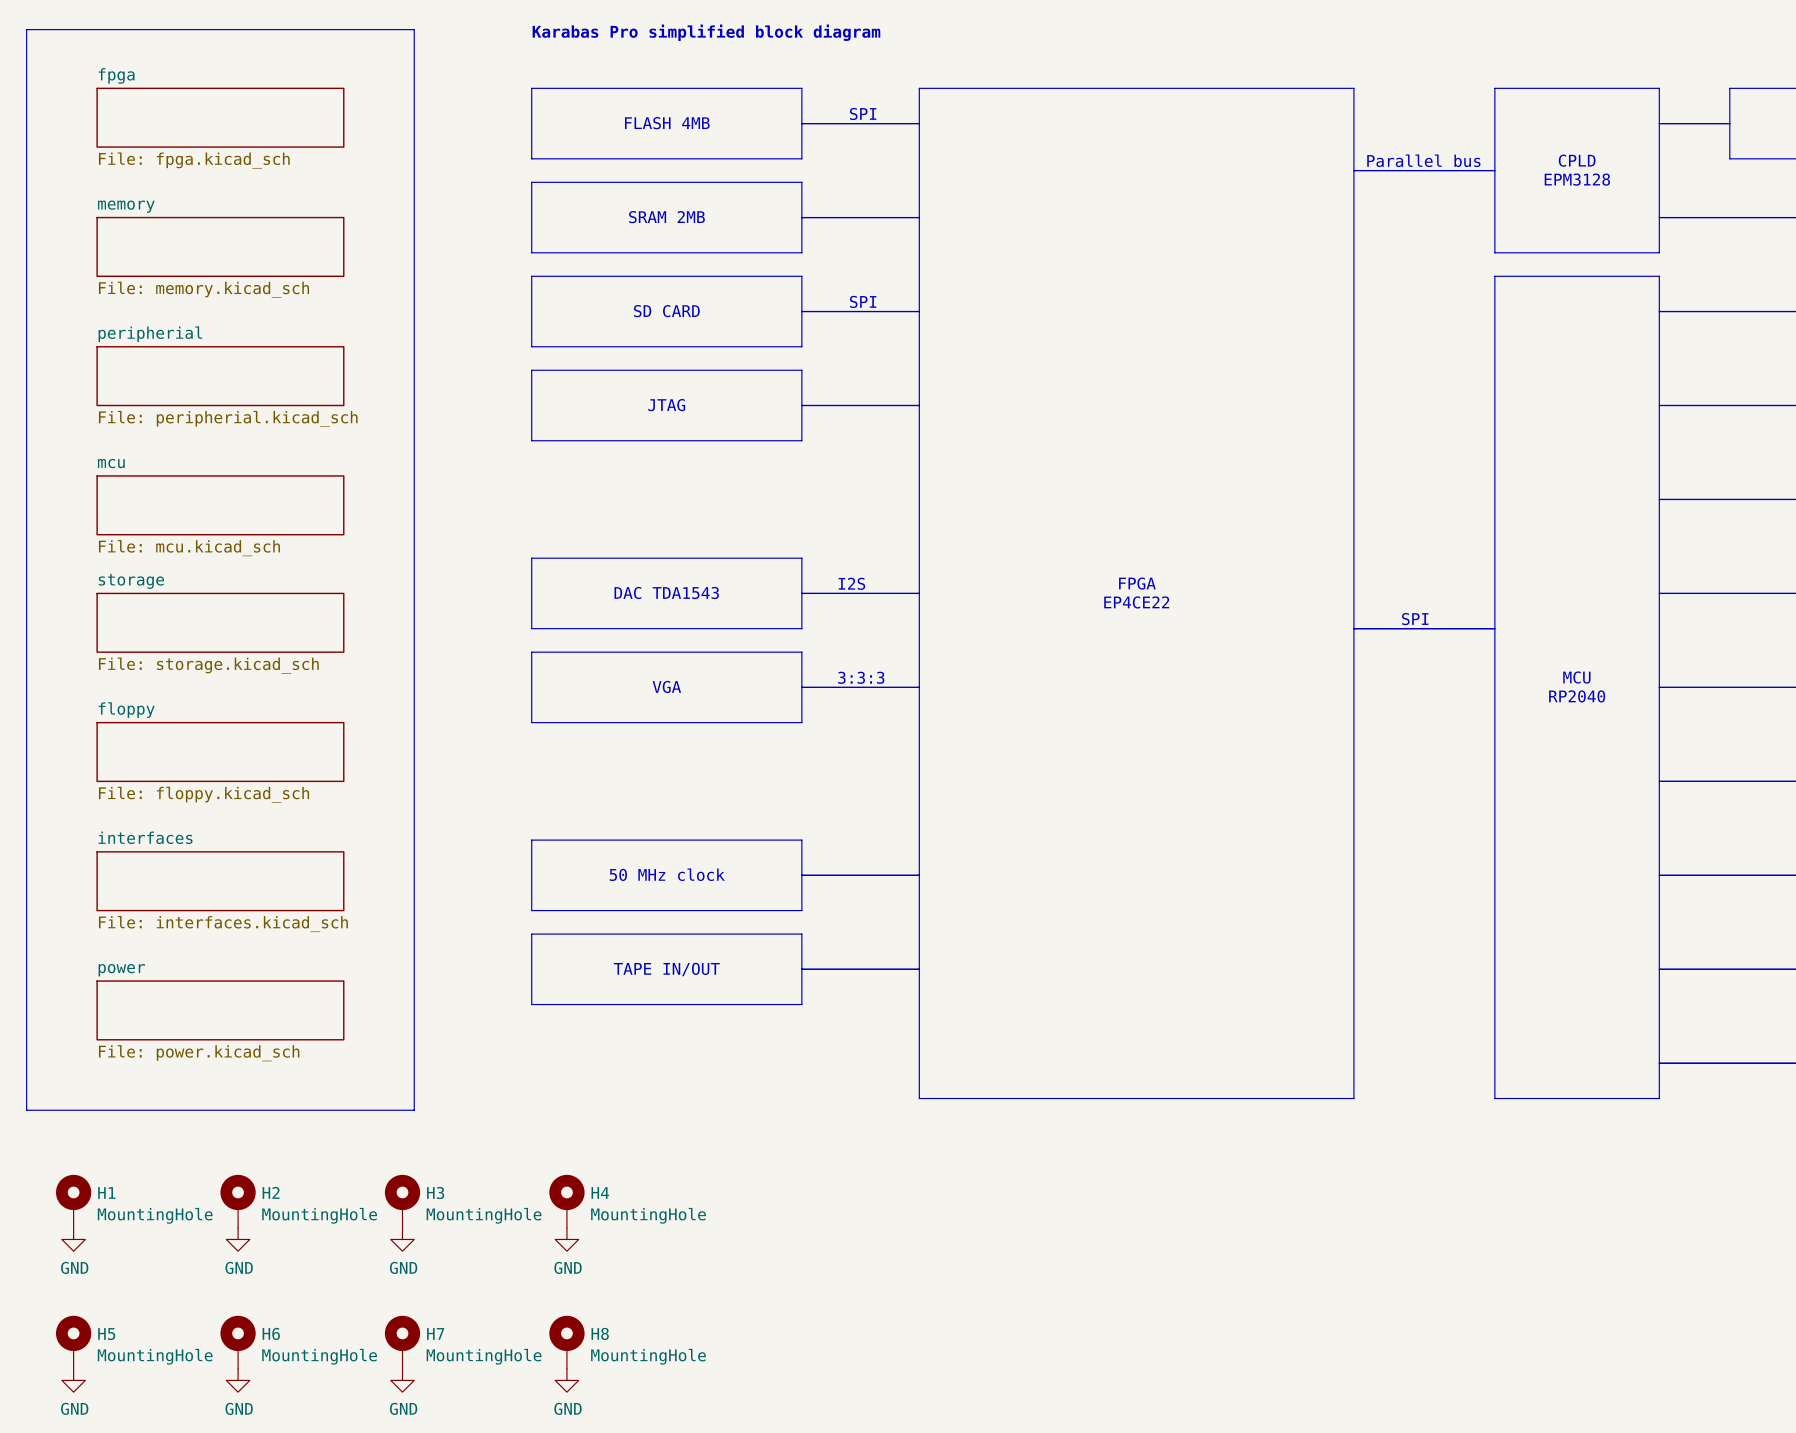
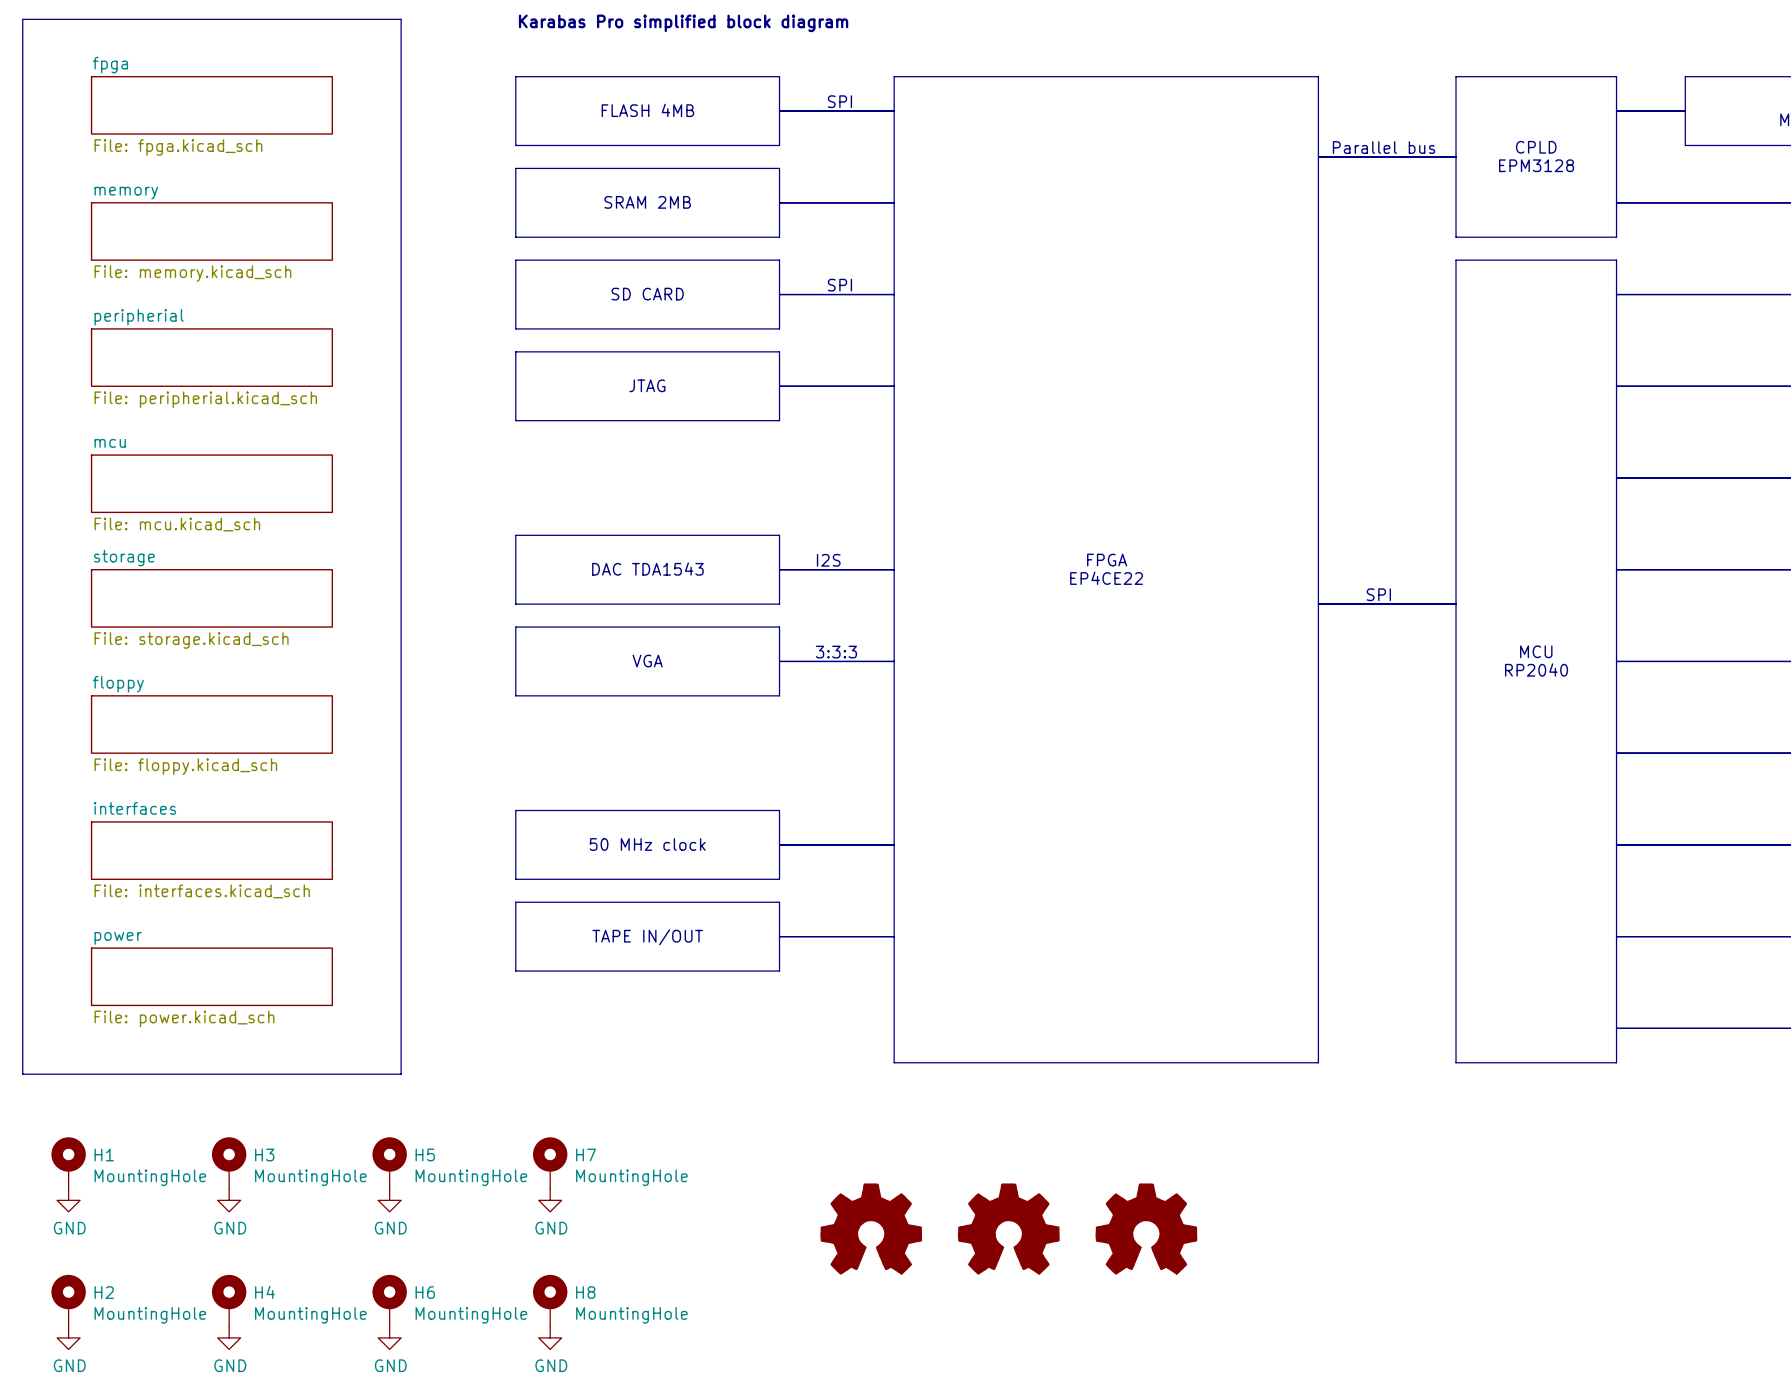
H2 name: H2 (271, 1192) -> H3 (264, 1154)
H3 name: H3 (435, 1192) -> H5 (425, 1154)
H4 name: H4 (600, 1192) -> H7 (586, 1154)
part: none -> (871, 1229)
part: none -> (1008, 1229)
part: none -> (1146, 1229)
H6 name: H6 (271, 1333) -> H4 (264, 1292)
H7 name: H7 (435, 1333) -> H6 (425, 1292)
H5 name: H5 (106, 1334) -> H2 (104, 1292)

